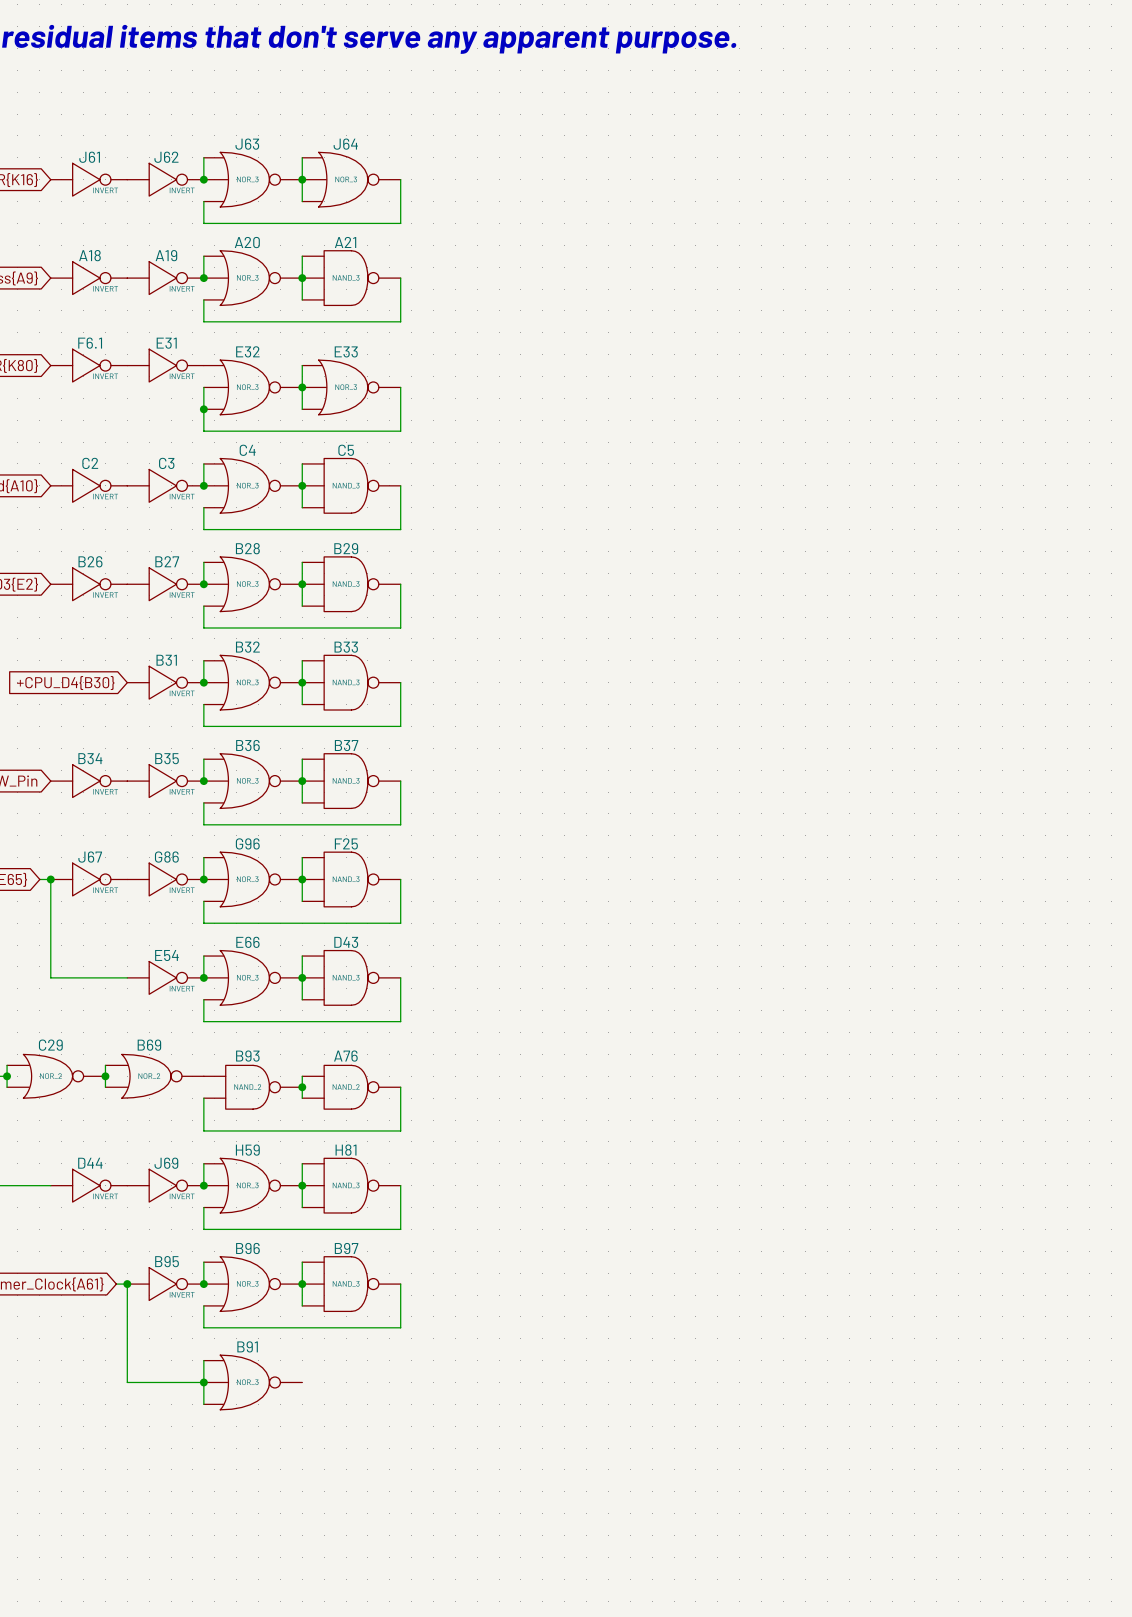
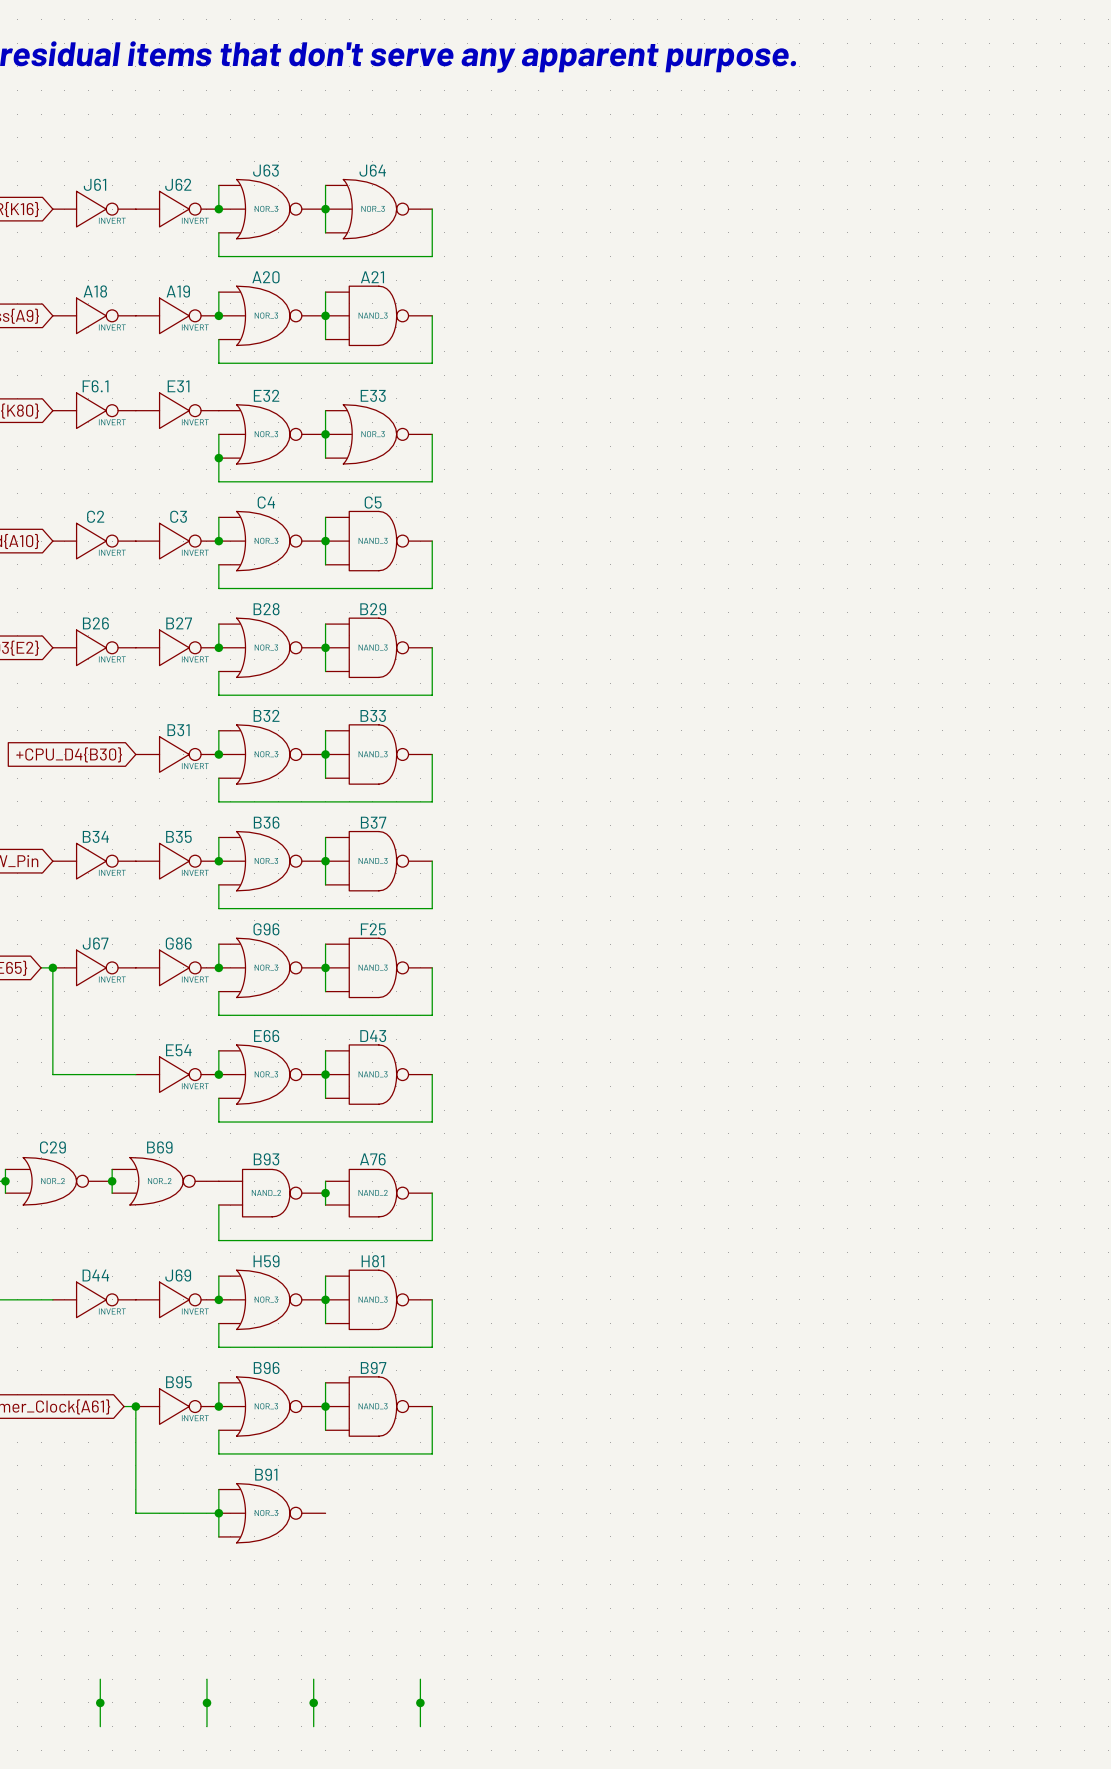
wire: none -> (100, 1679) (100, 1726)
wire: none -> (206, 1679) (206, 1726)
wire: none -> (313, 1679) (313, 1726)
wire: none -> (420, 1679) (420, 1726)
junction: none -> (100, 1702)
junction: none -> (206, 1702)
junction: none -> (313, 1702)
junction: none -> (420, 1702)

